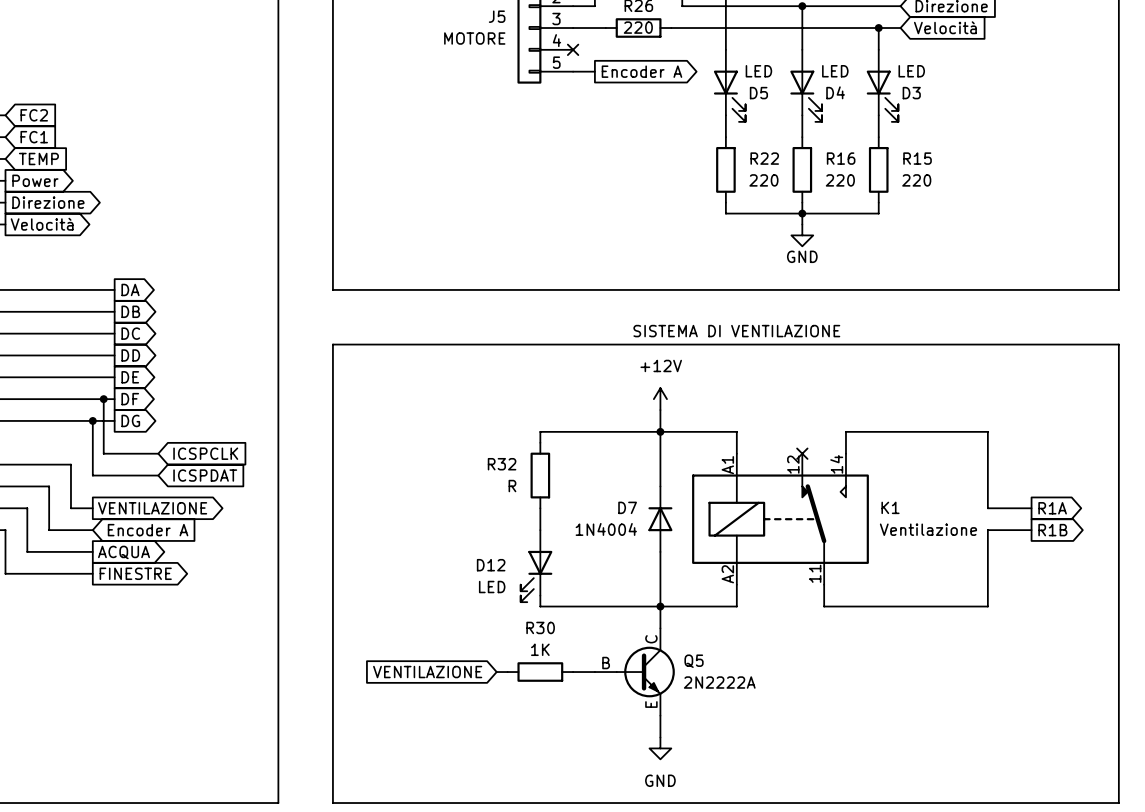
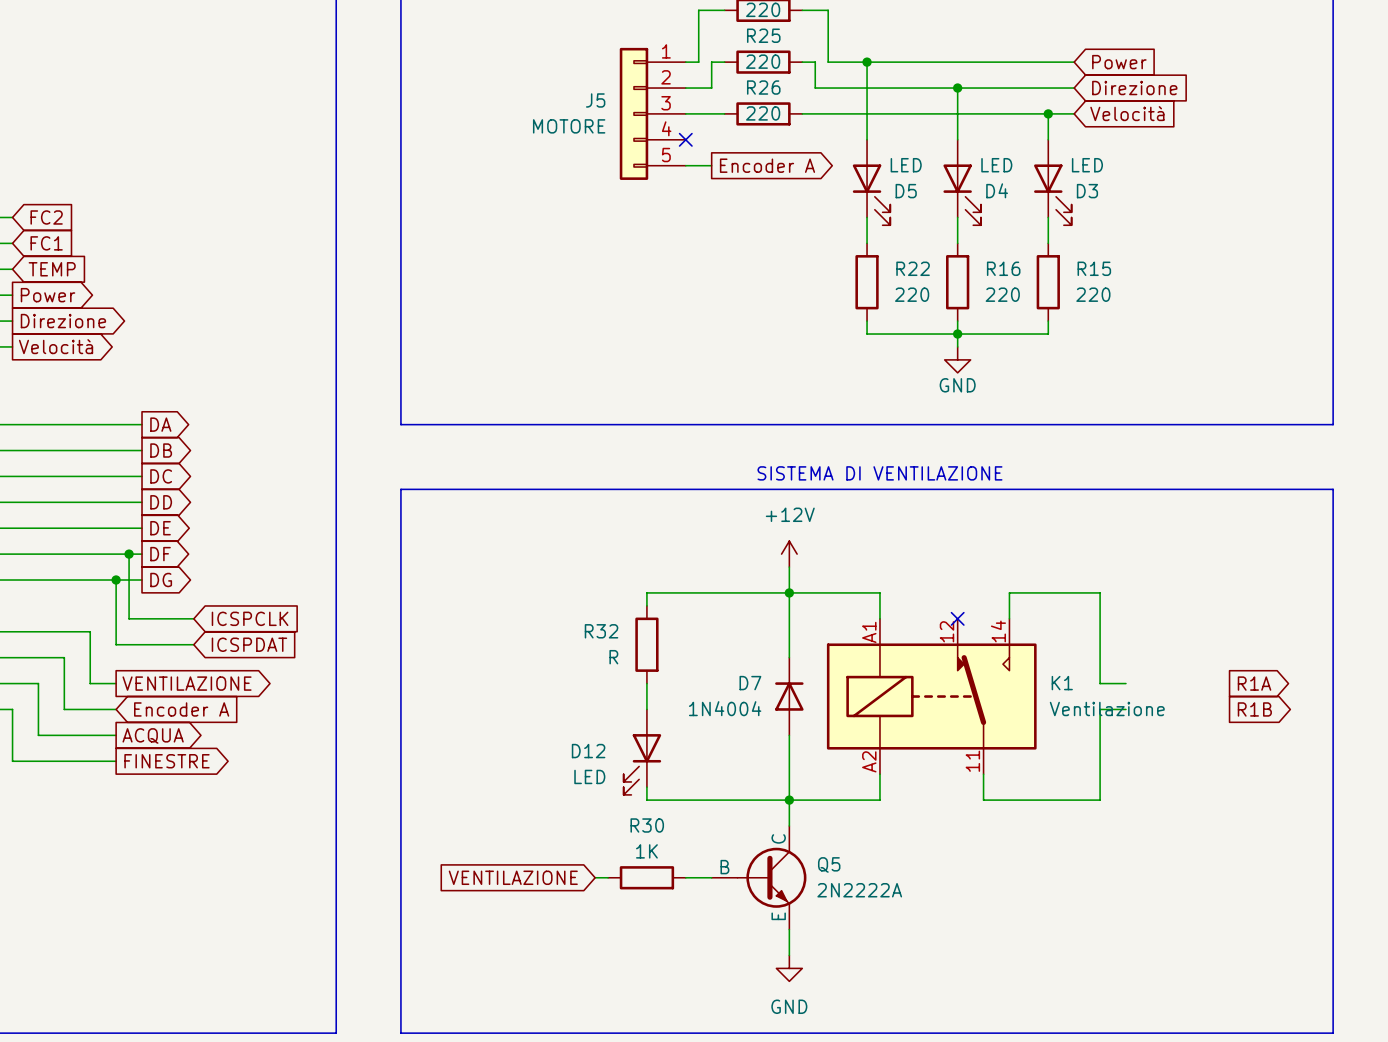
wire: (922, 431) (987, 431) (987, 508) (1031, 508) -> (1100, 592) (1100, 683) (1125, 683)
wire: (1031, 530) (987, 530) (987, 606) (922, 606) -> (1125, 709) (1100, 709) (1100, 800)

